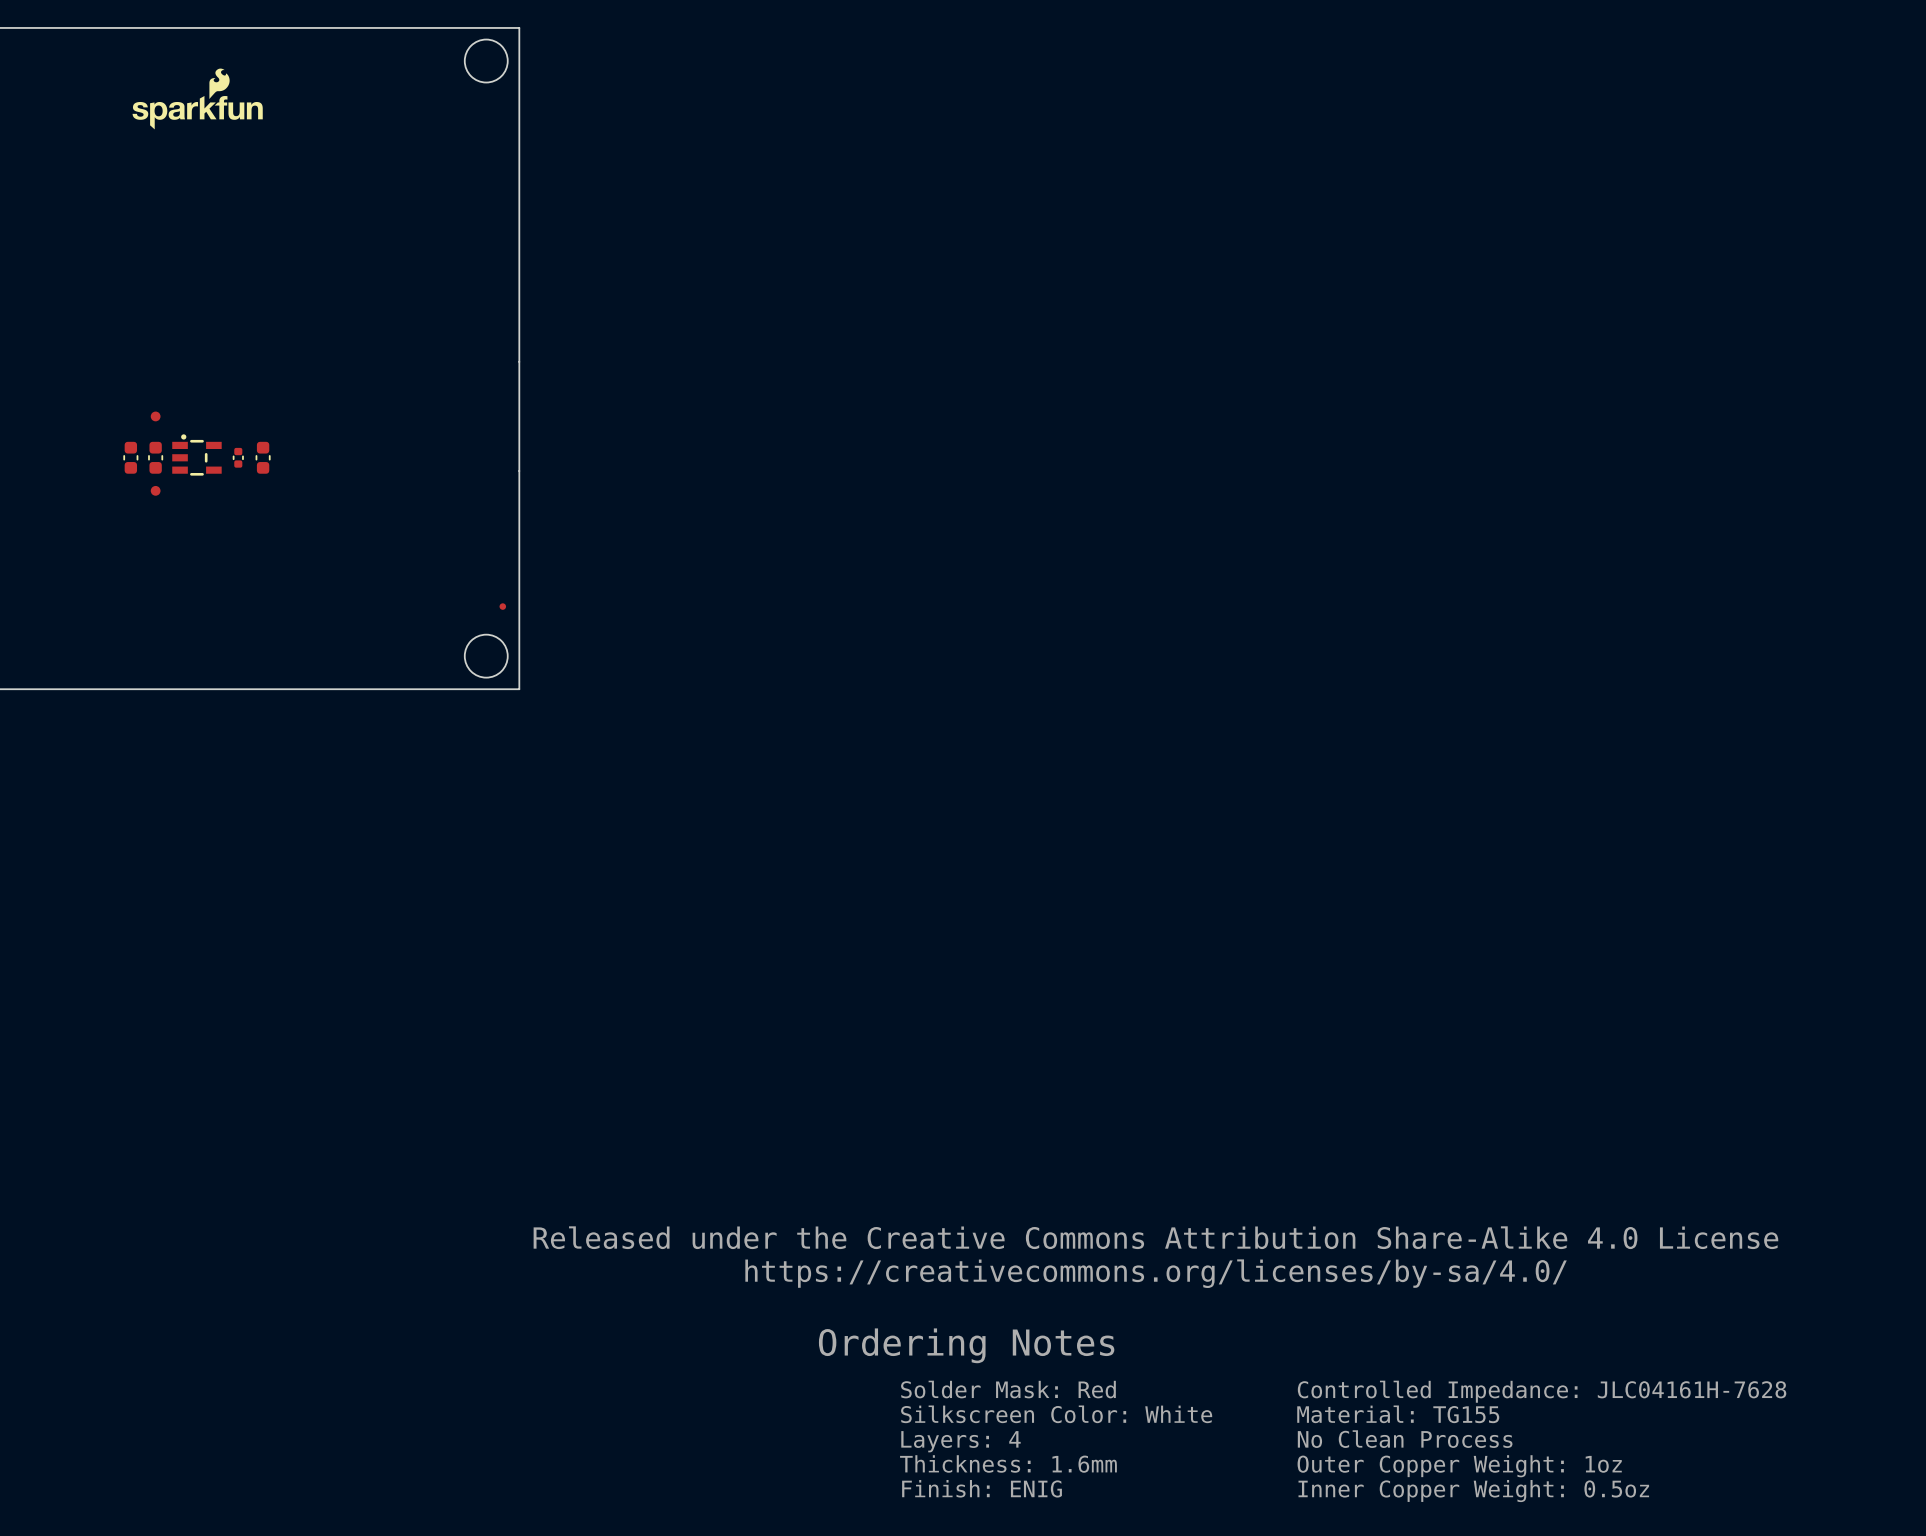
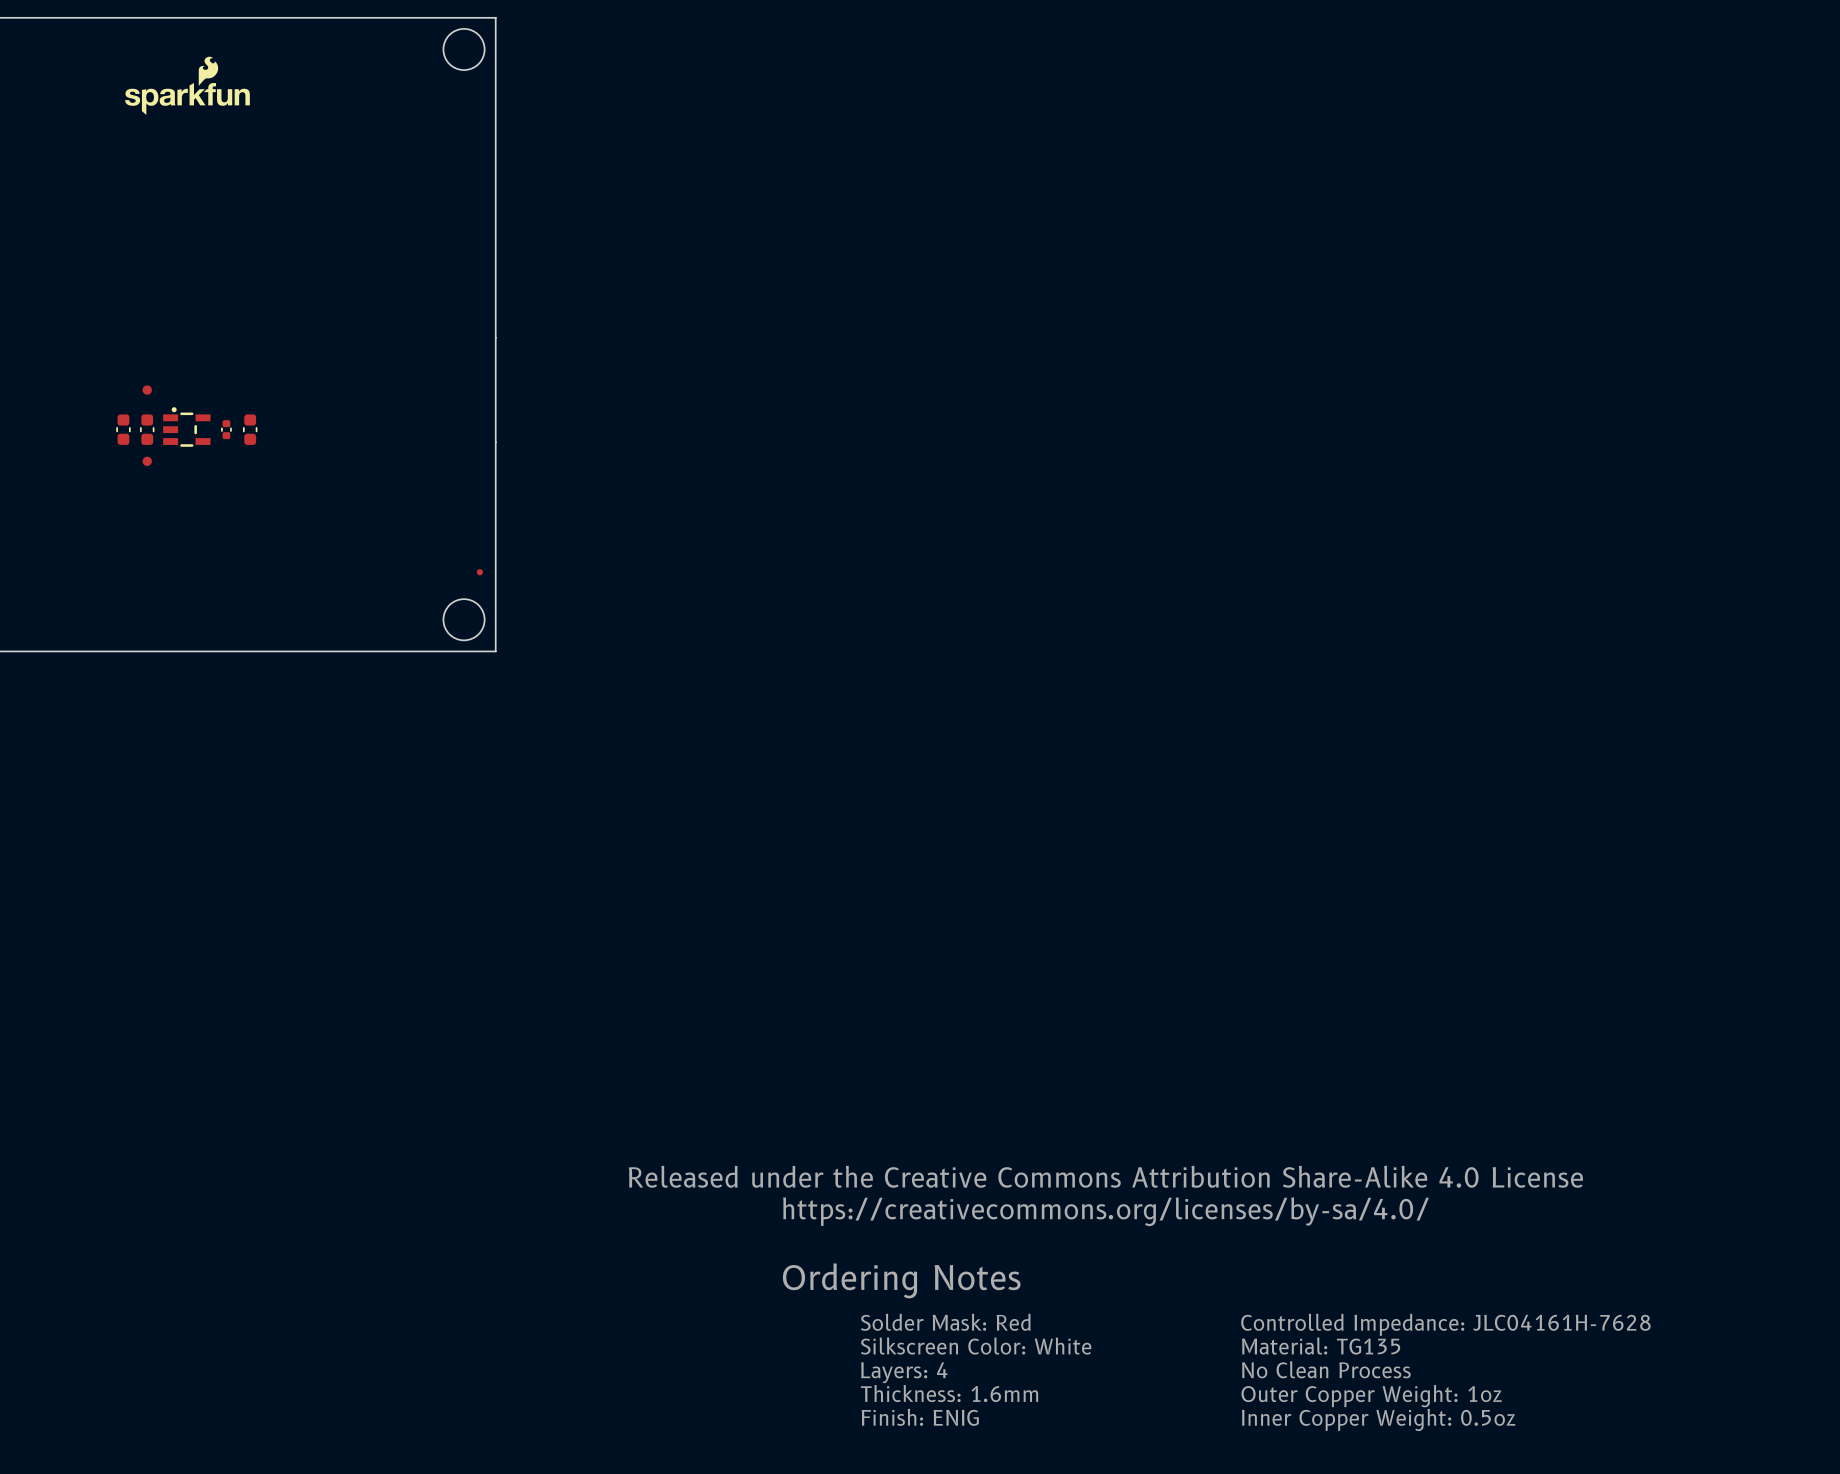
text: Material: TG155 (1398, 1414) -> Material: TG135 (1321, 1346)

